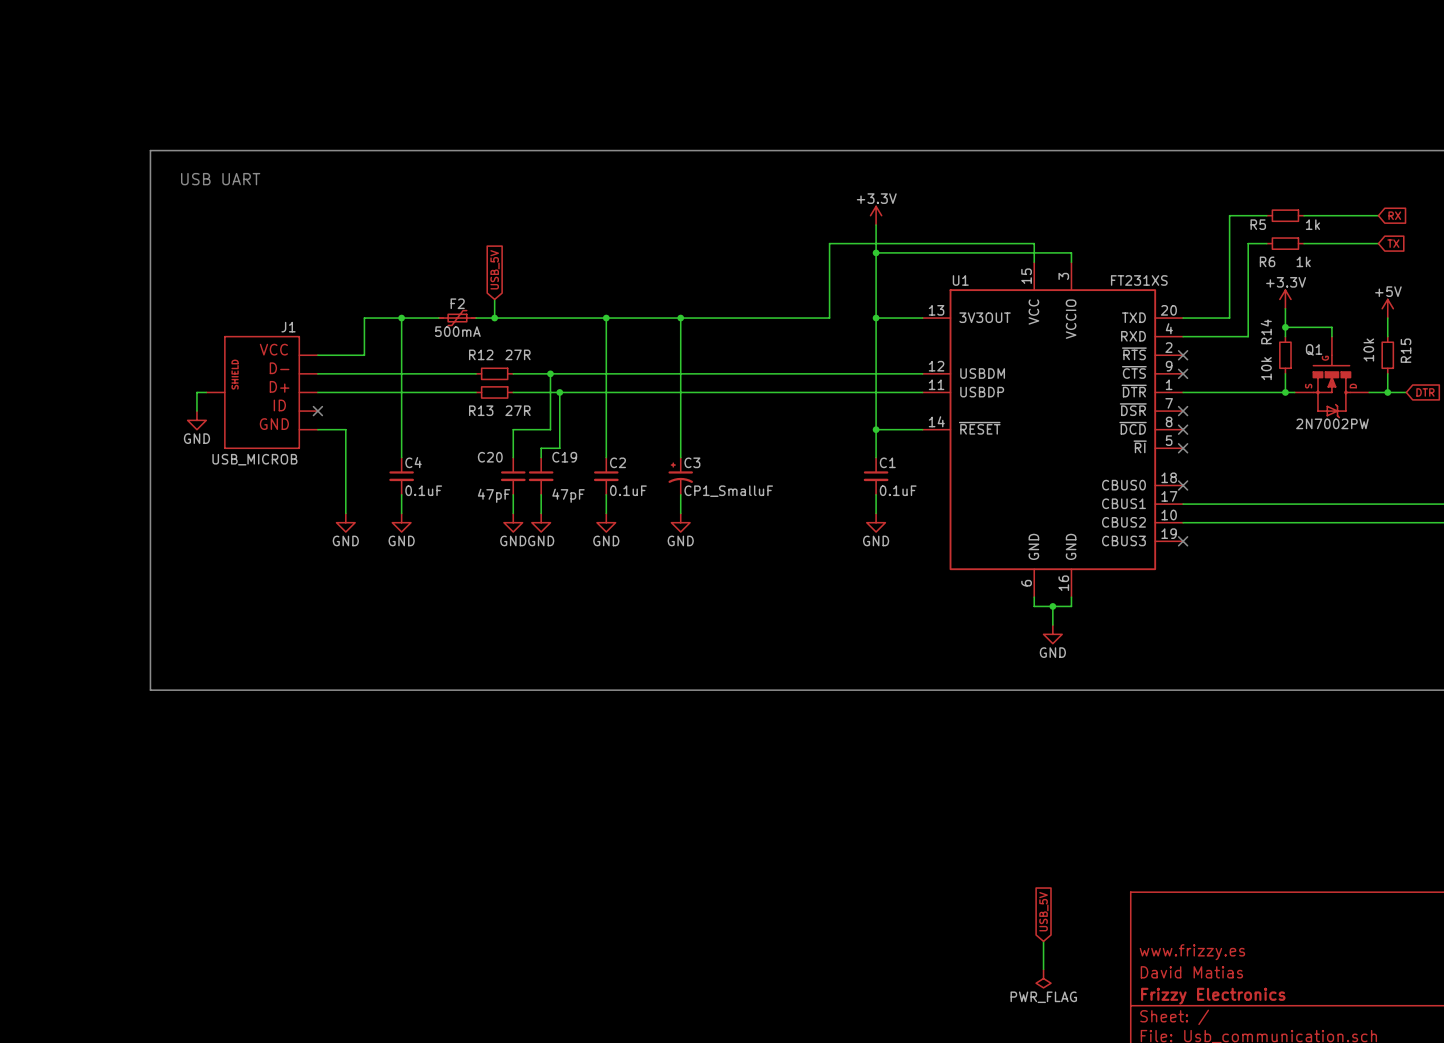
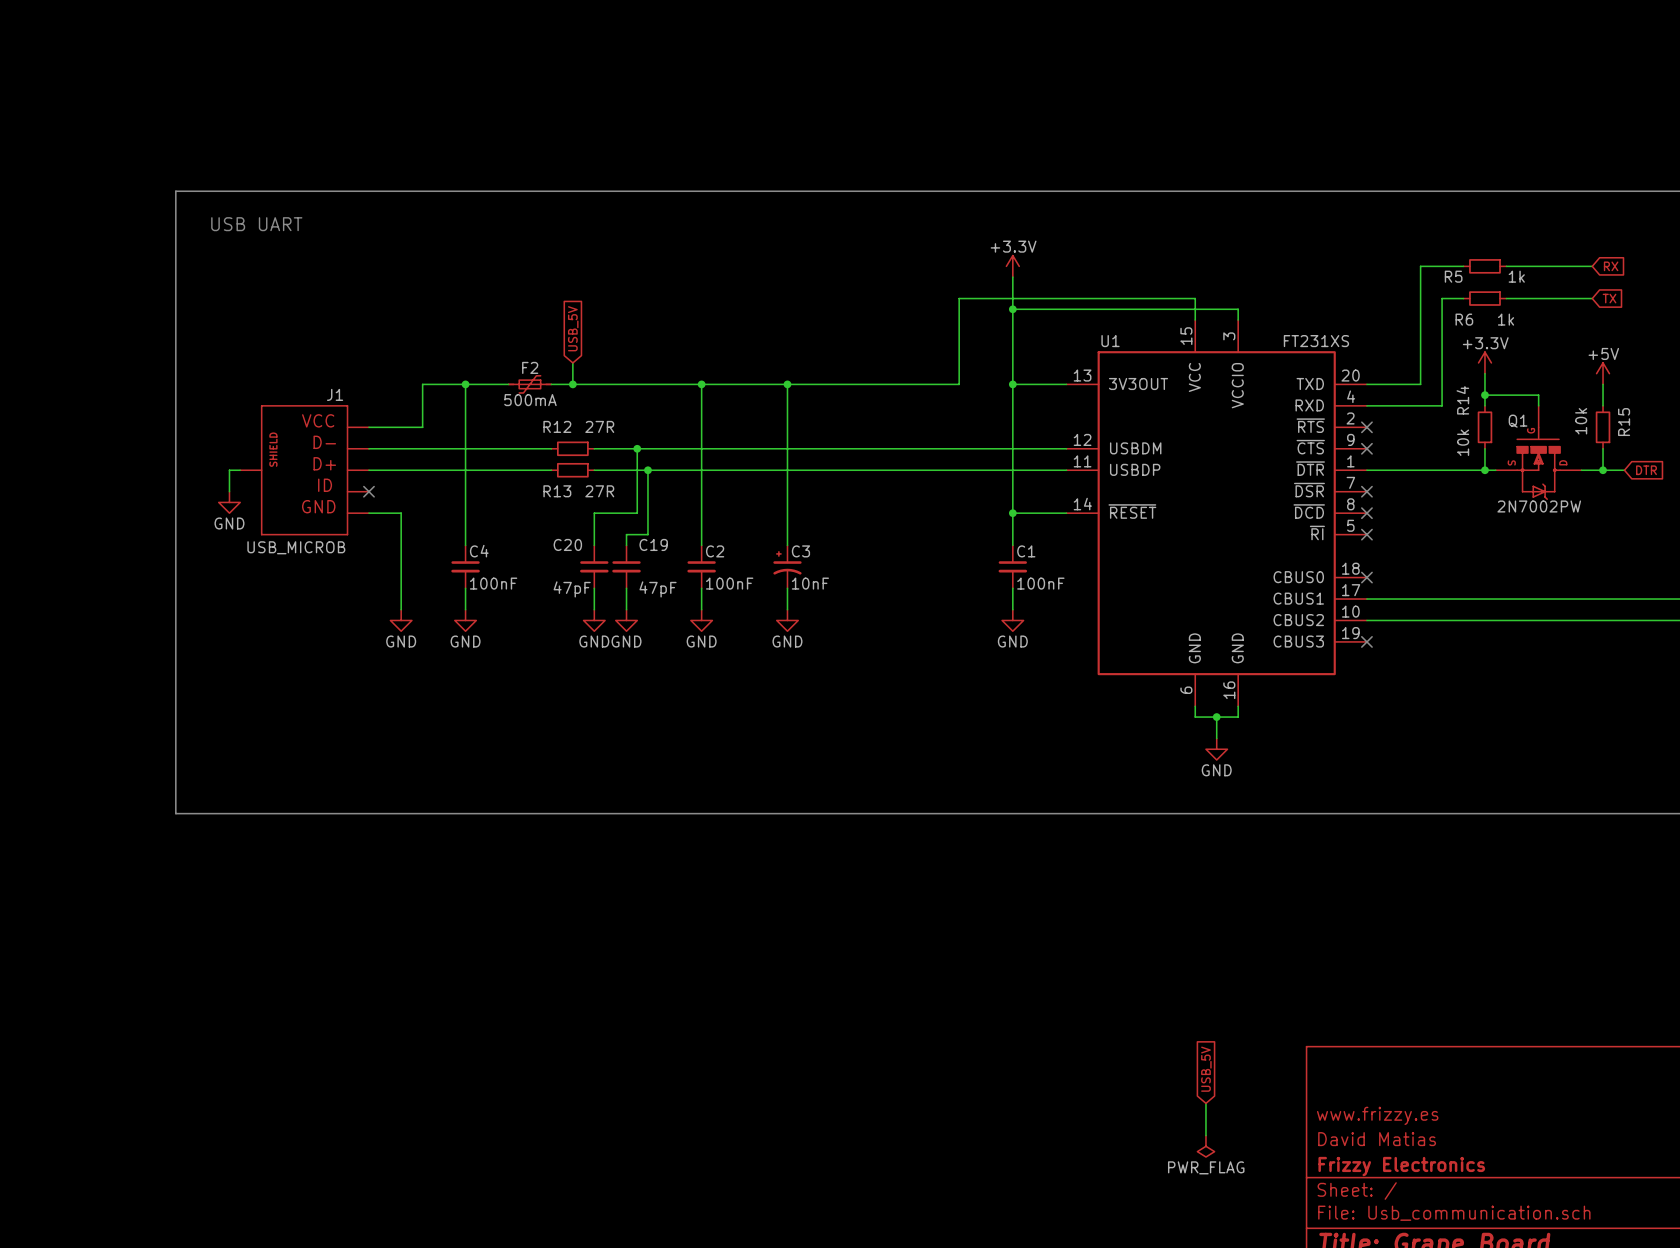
C4 value: 0.1uF (423, 490) -> 100nF (493, 583)
C2 value: 0.1uF (628, 490) -> 100nF (729, 583)
C1 value: 0.1uF (898, 490) -> 100nF (1040, 583)
C3 value: CP1_SmalluF (728, 491) -> 10nF (810, 583)

